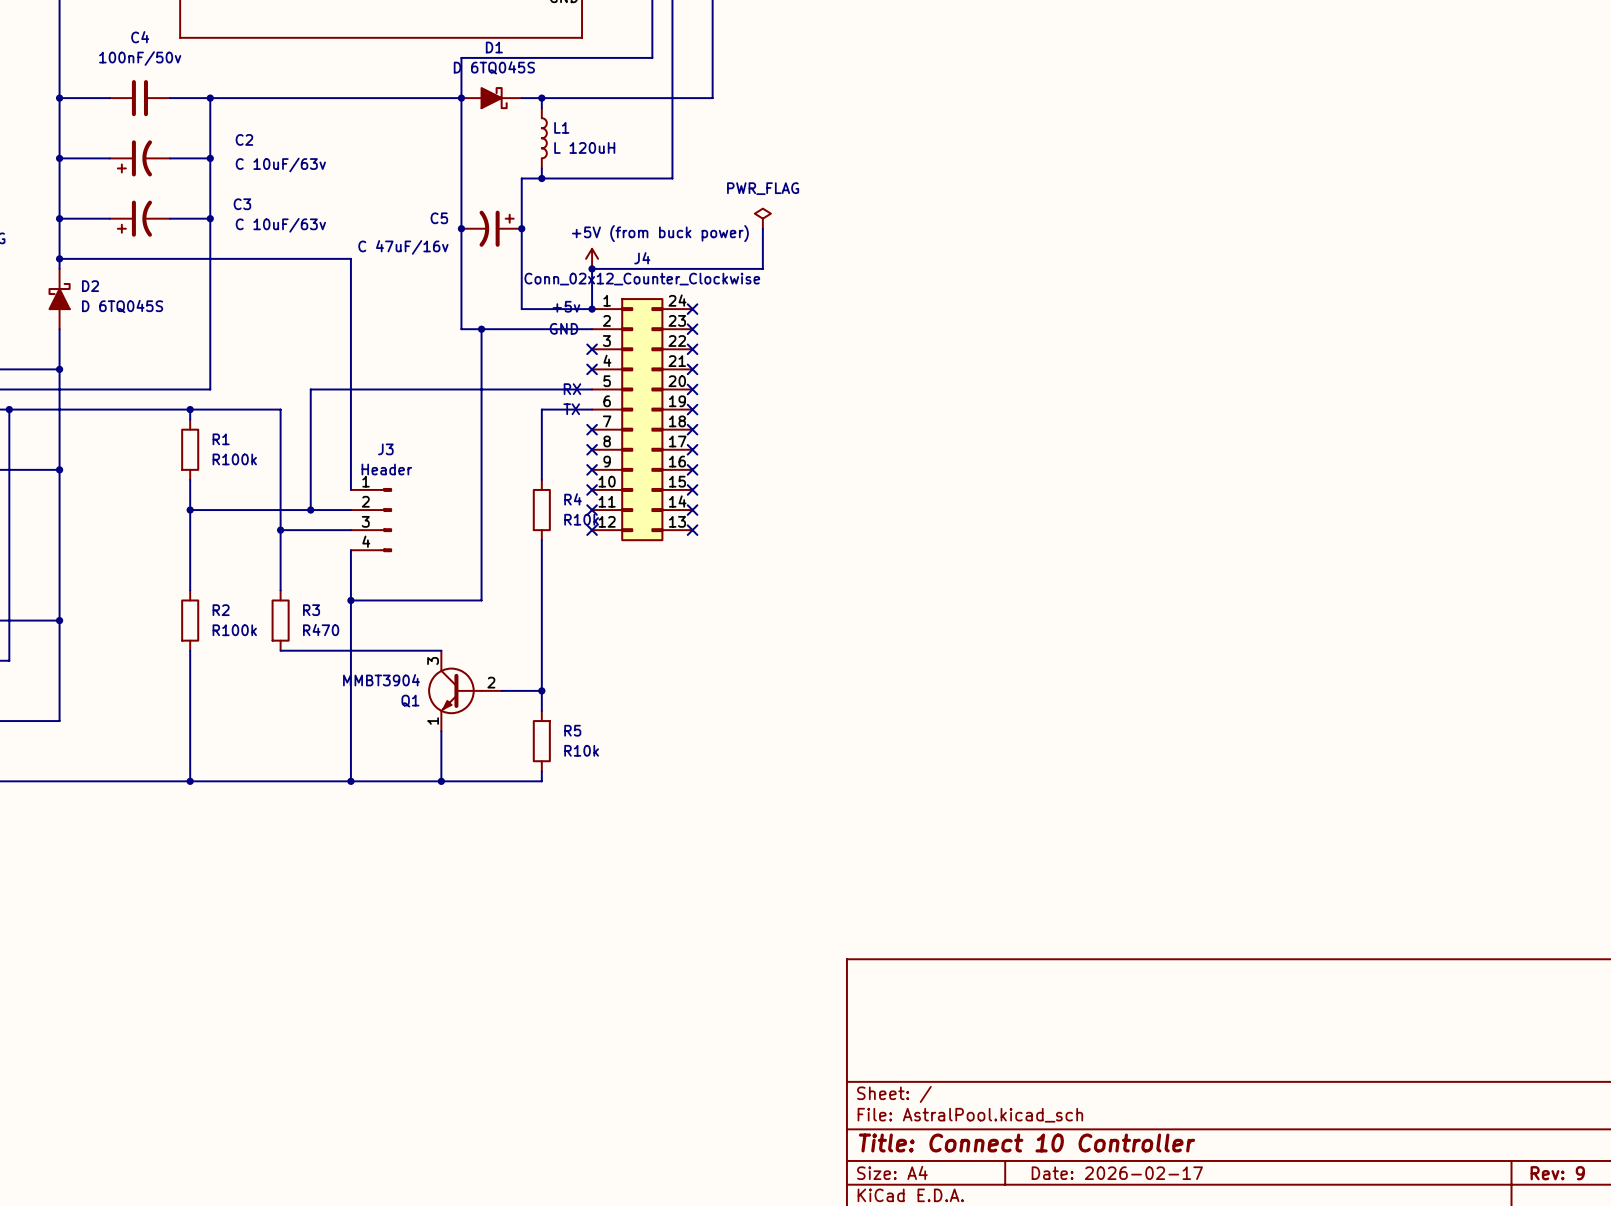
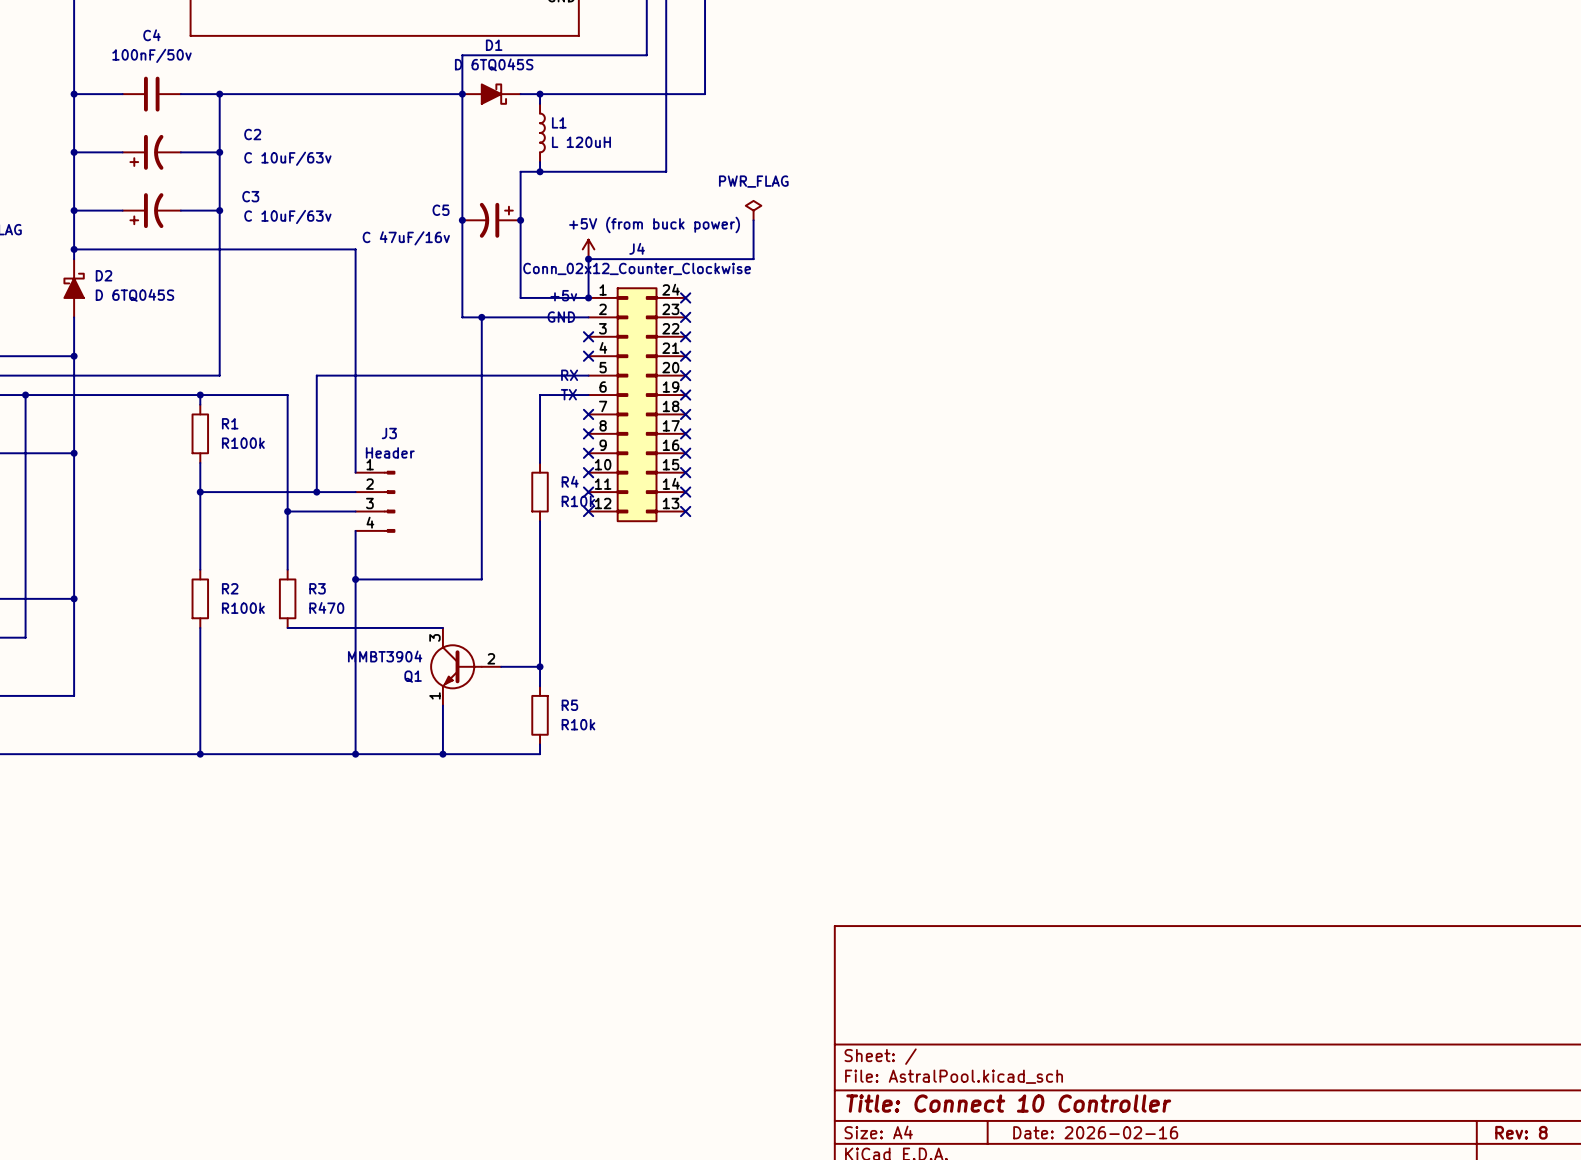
title block: Date: 2026-02-17 (1117, 1173) -> Date: 2026-02-16 (1095, 1132)
title block: Rev: 9 (1557, 1173) -> Rev: 8 (1521, 1132)

